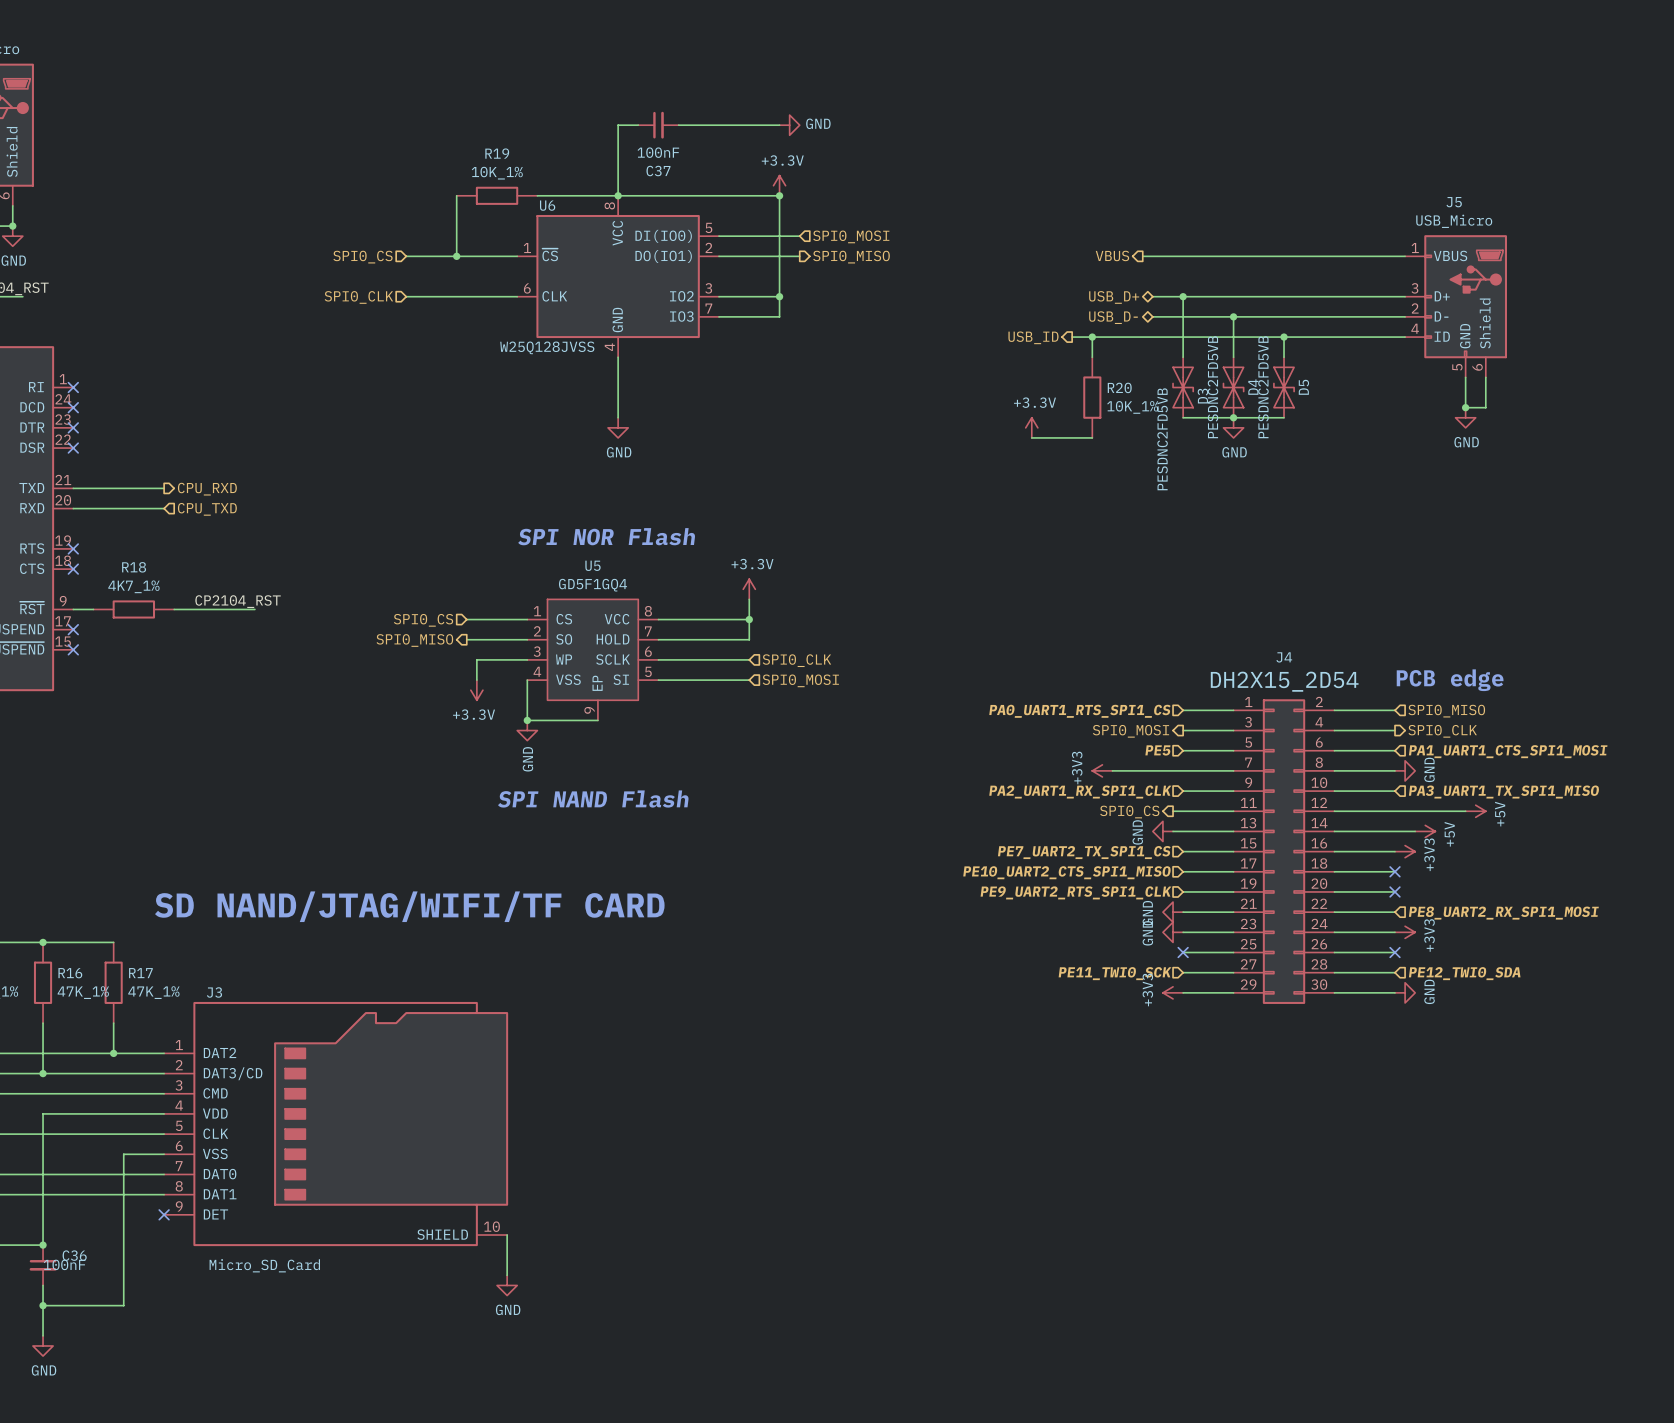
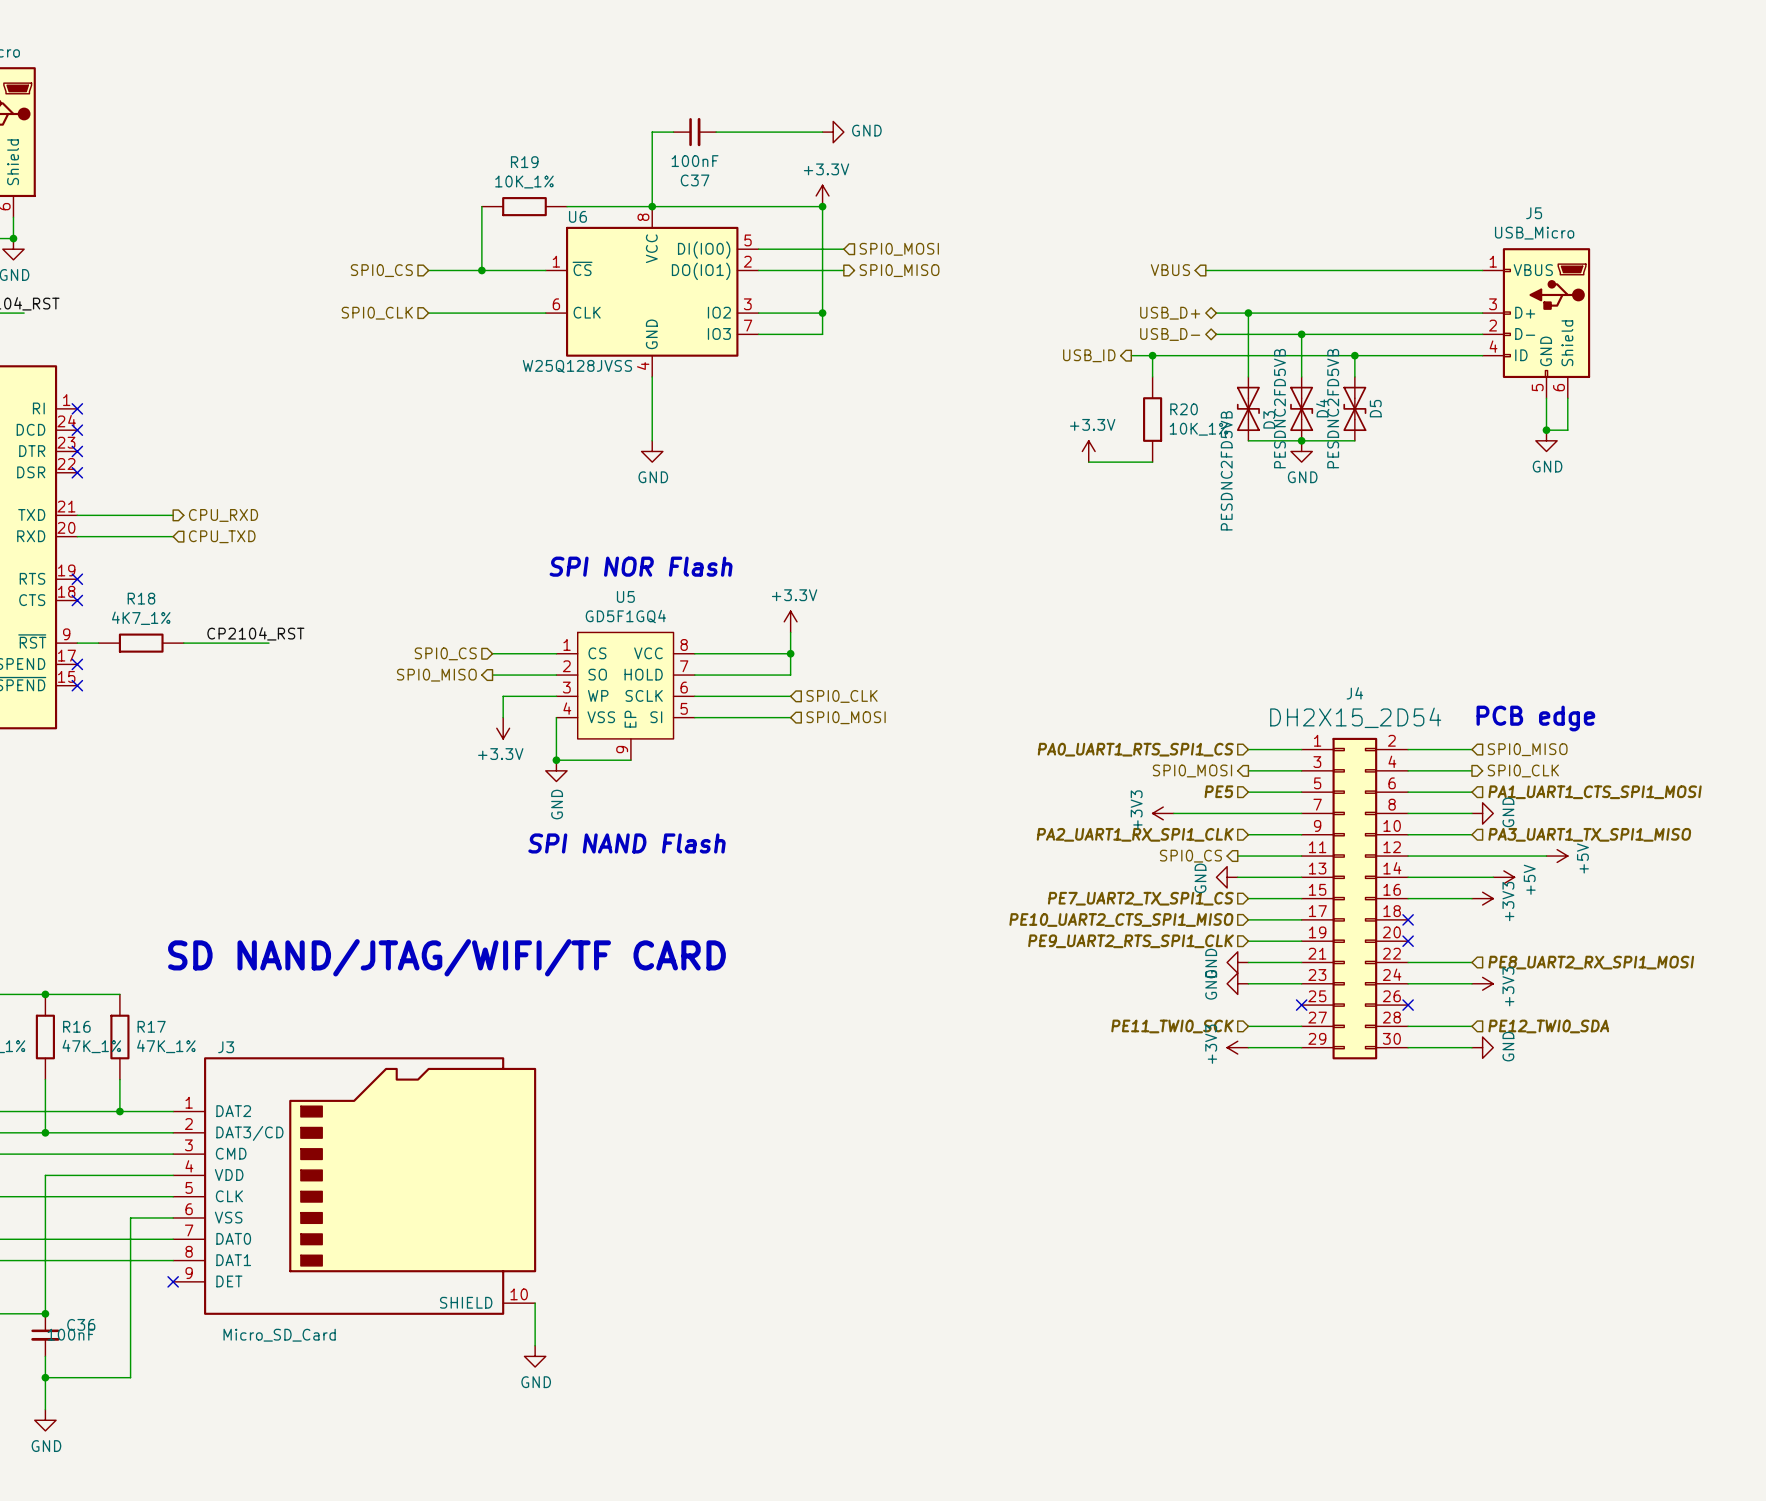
wire: (1334, 871) (1395, 871) -> none
no-connect mark: none -> (1408, 919)
no-connect mark: (1395, 871) -> none
wire: (1334, 891) (1395, 891) -> none
no-connect mark: none -> (1408, 941)
no-connect mark: (1395, 891) -> none
wire: (1183, 952) (1233, 952) -> none
no-connect mark: (1183, 952) -> none
no-connect mark: none -> (1301, 1005)
wire: (1334, 952) (1395, 952) -> none
no-connect mark: none -> (1408, 1005)
no-connect mark: (1395, 952) -> none

